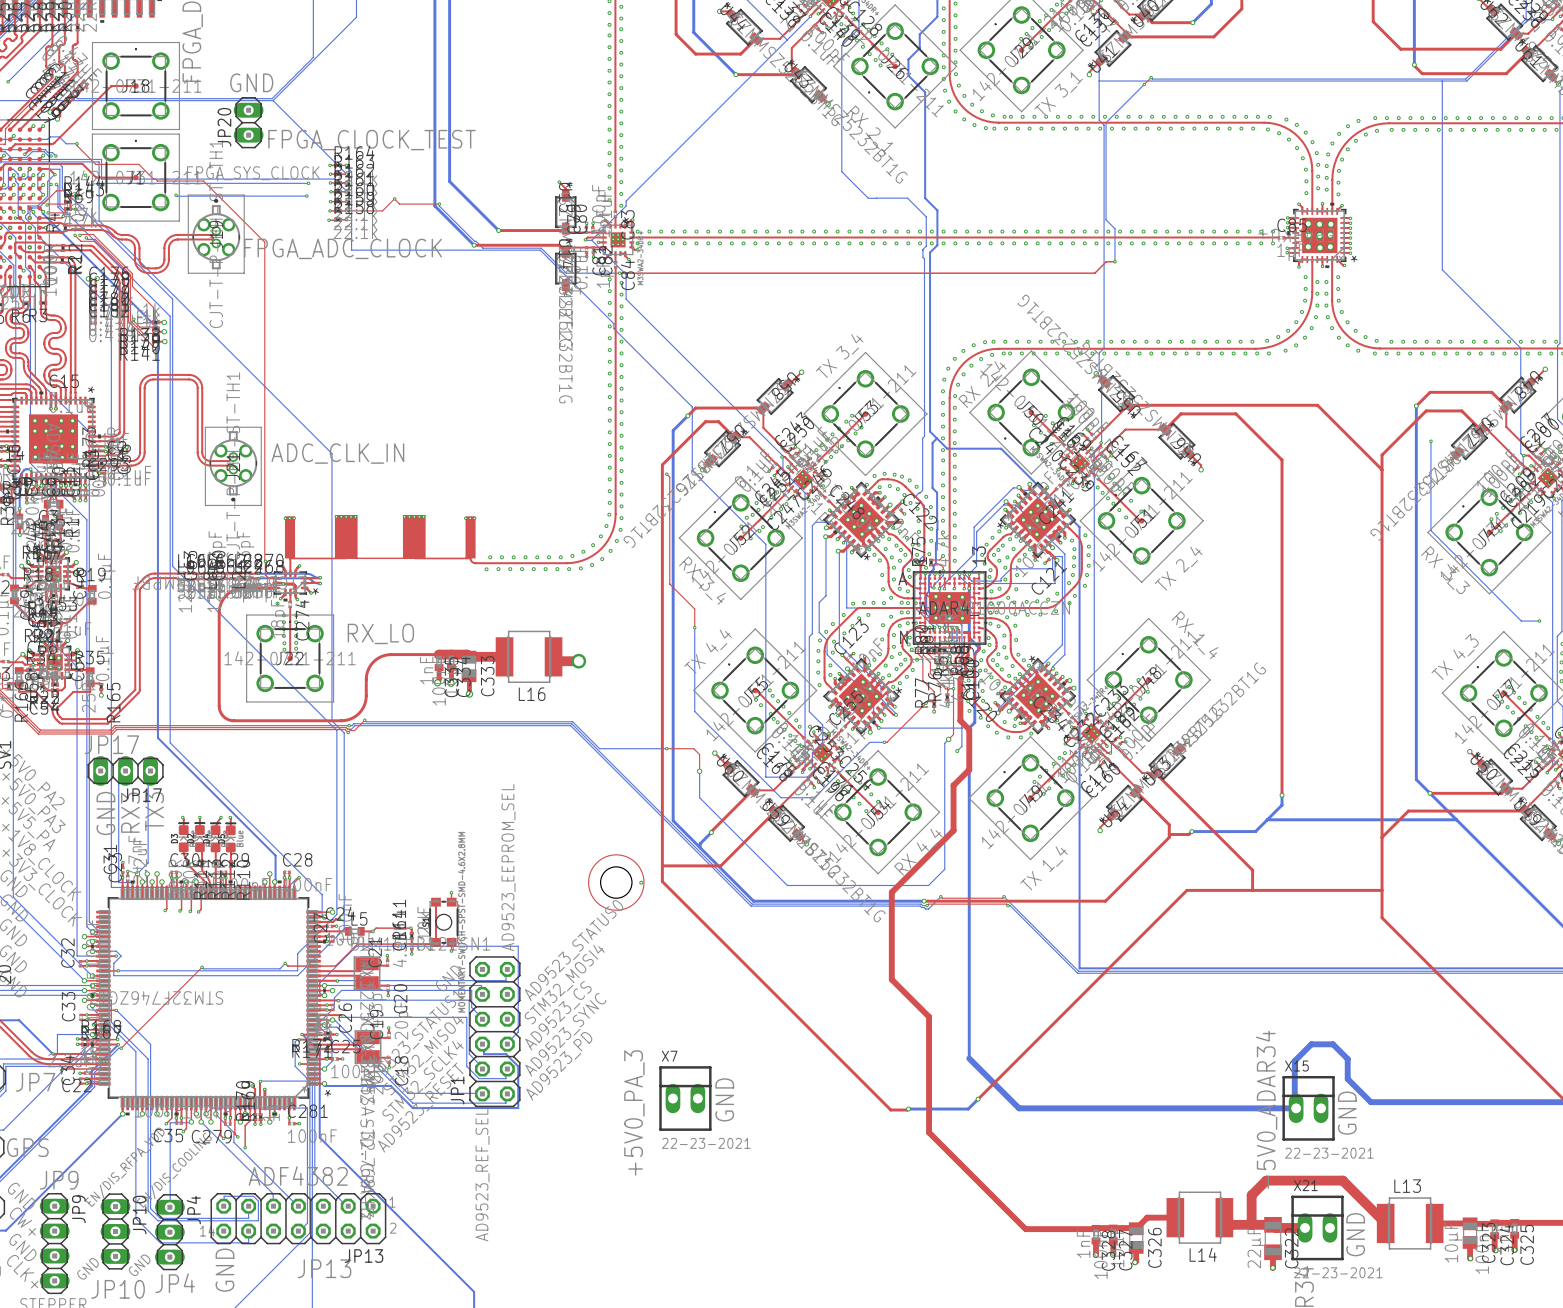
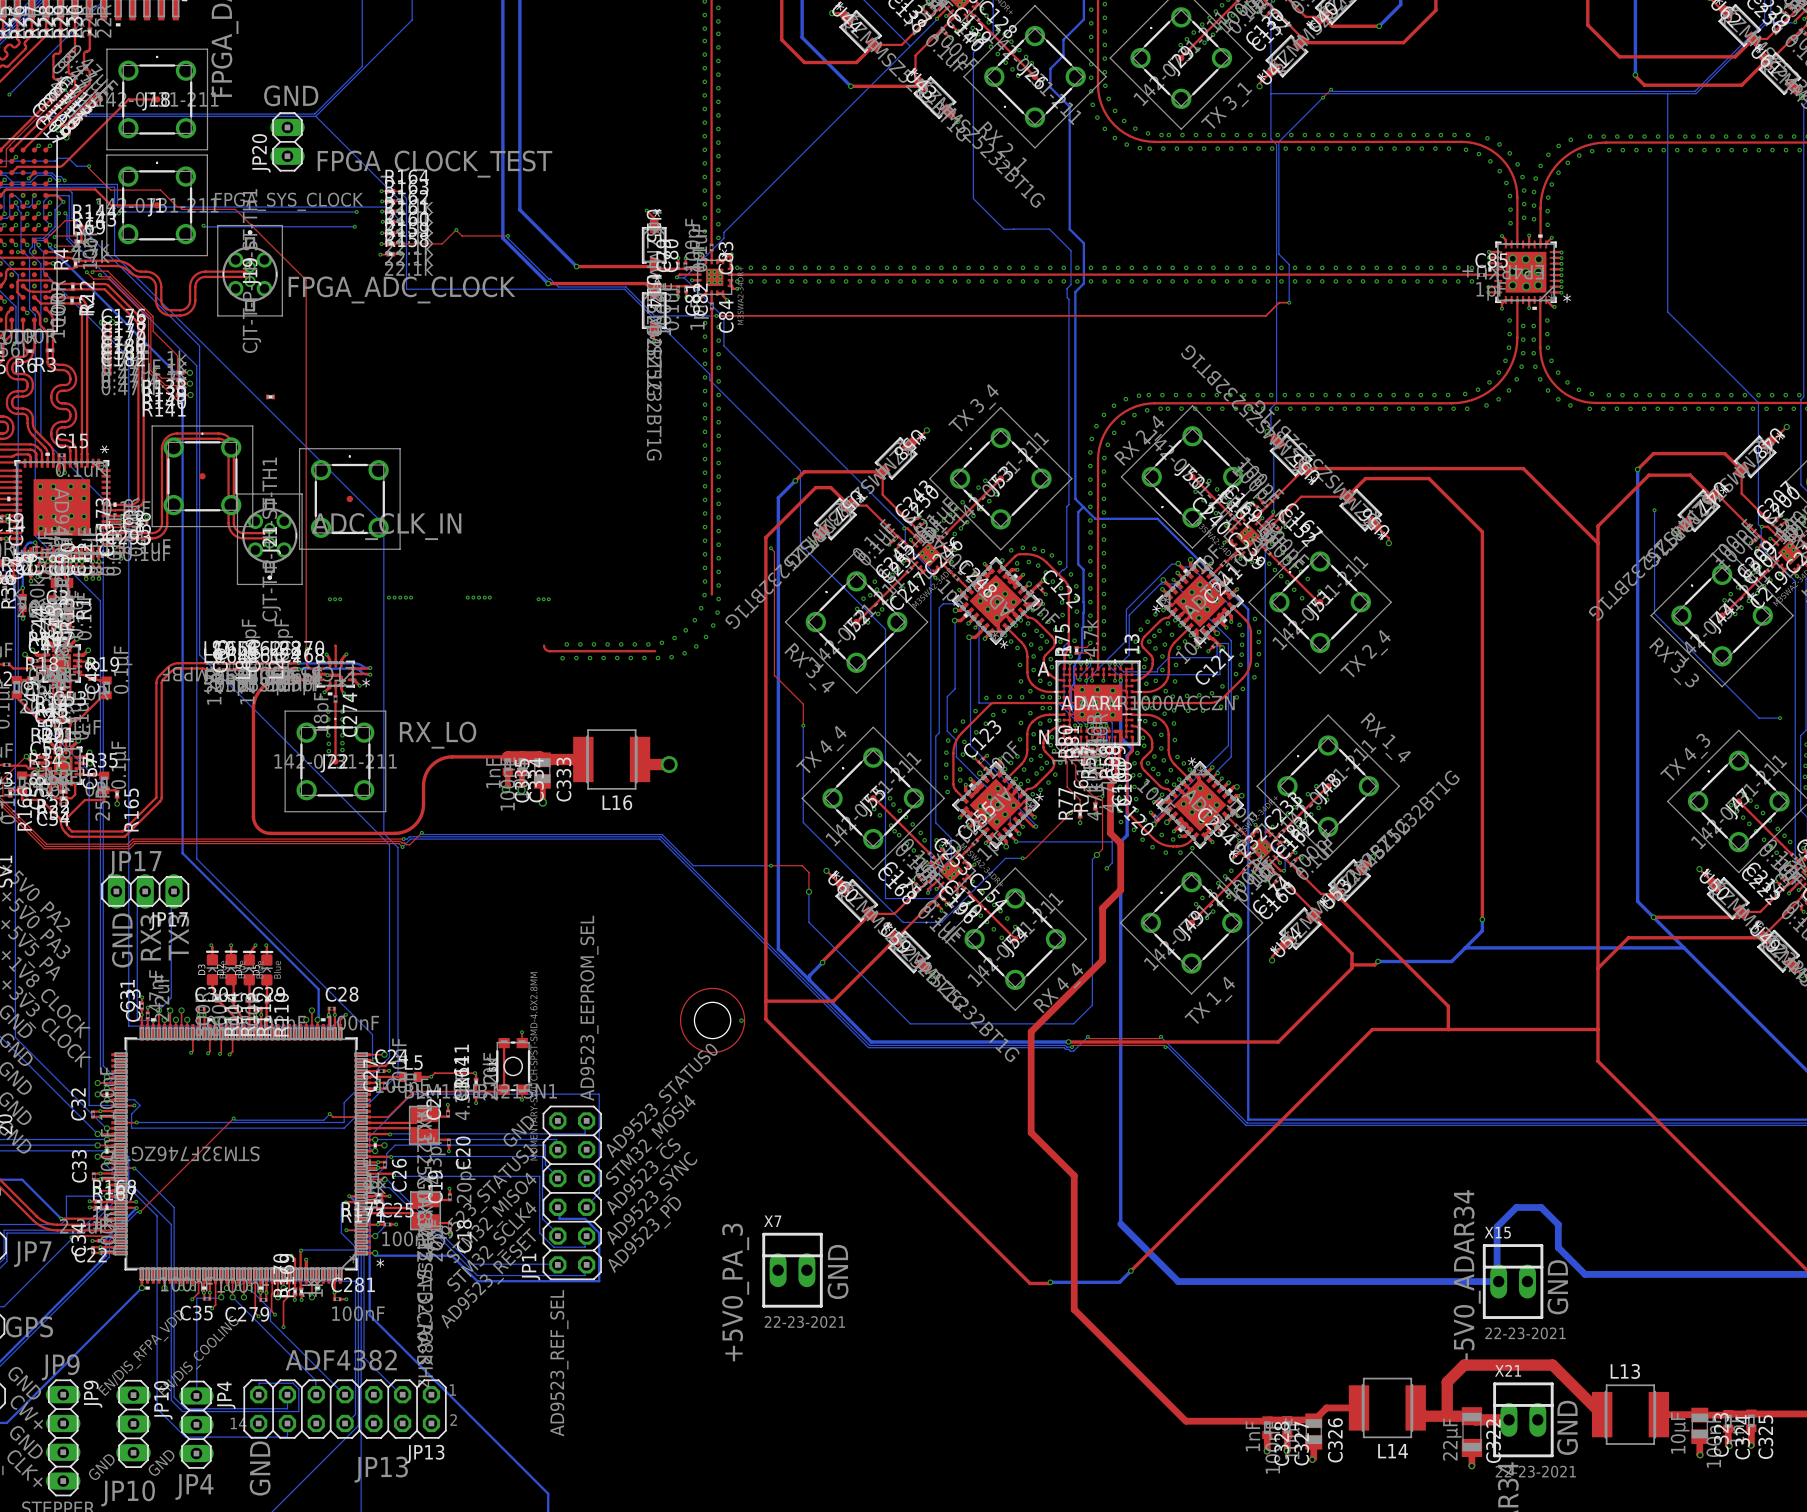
part: none -> (270, 396)
part: none -> (202, 476)
part: none -> (349, 498)
top track: (615, 514) (612, 530) (601, 548) (582, 560) (566, 563) -> none
part: (380, 537) -> none

